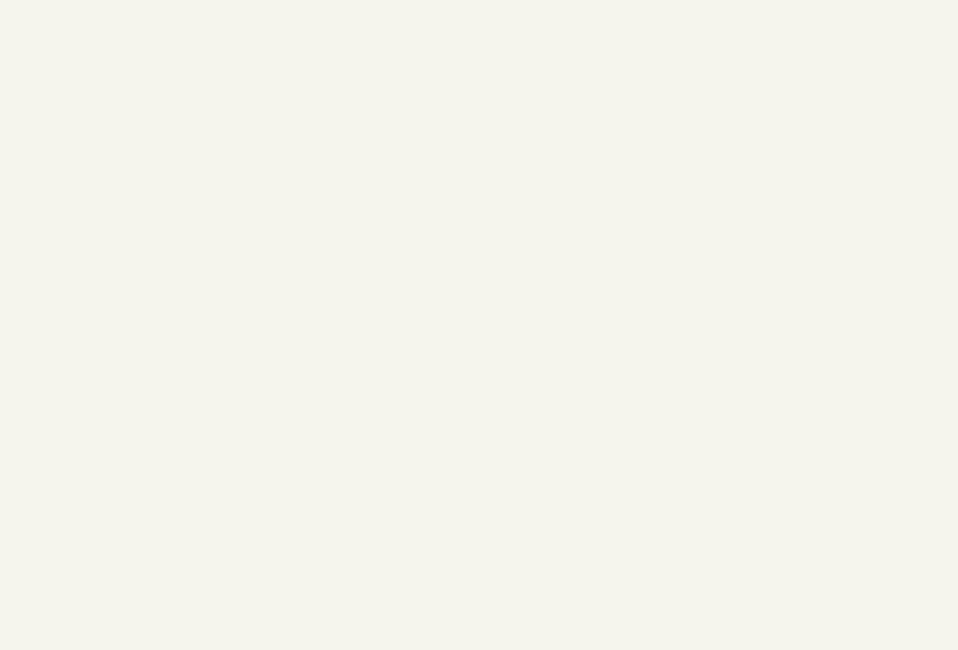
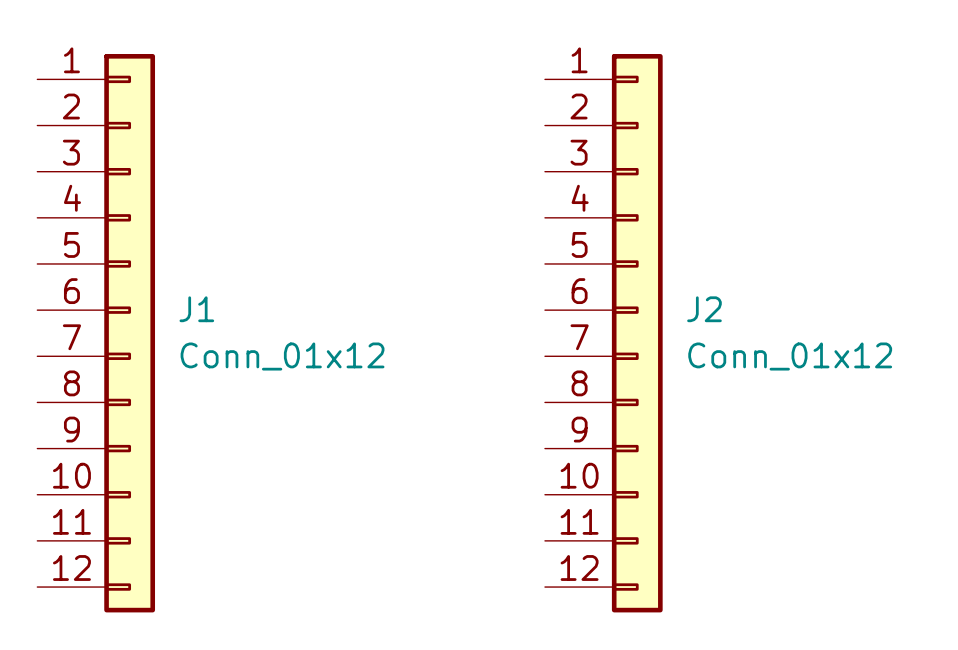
J1: none -> Conn_01x12 (96, 333)
J2: none -> Conn_01x12 (603, 333)

